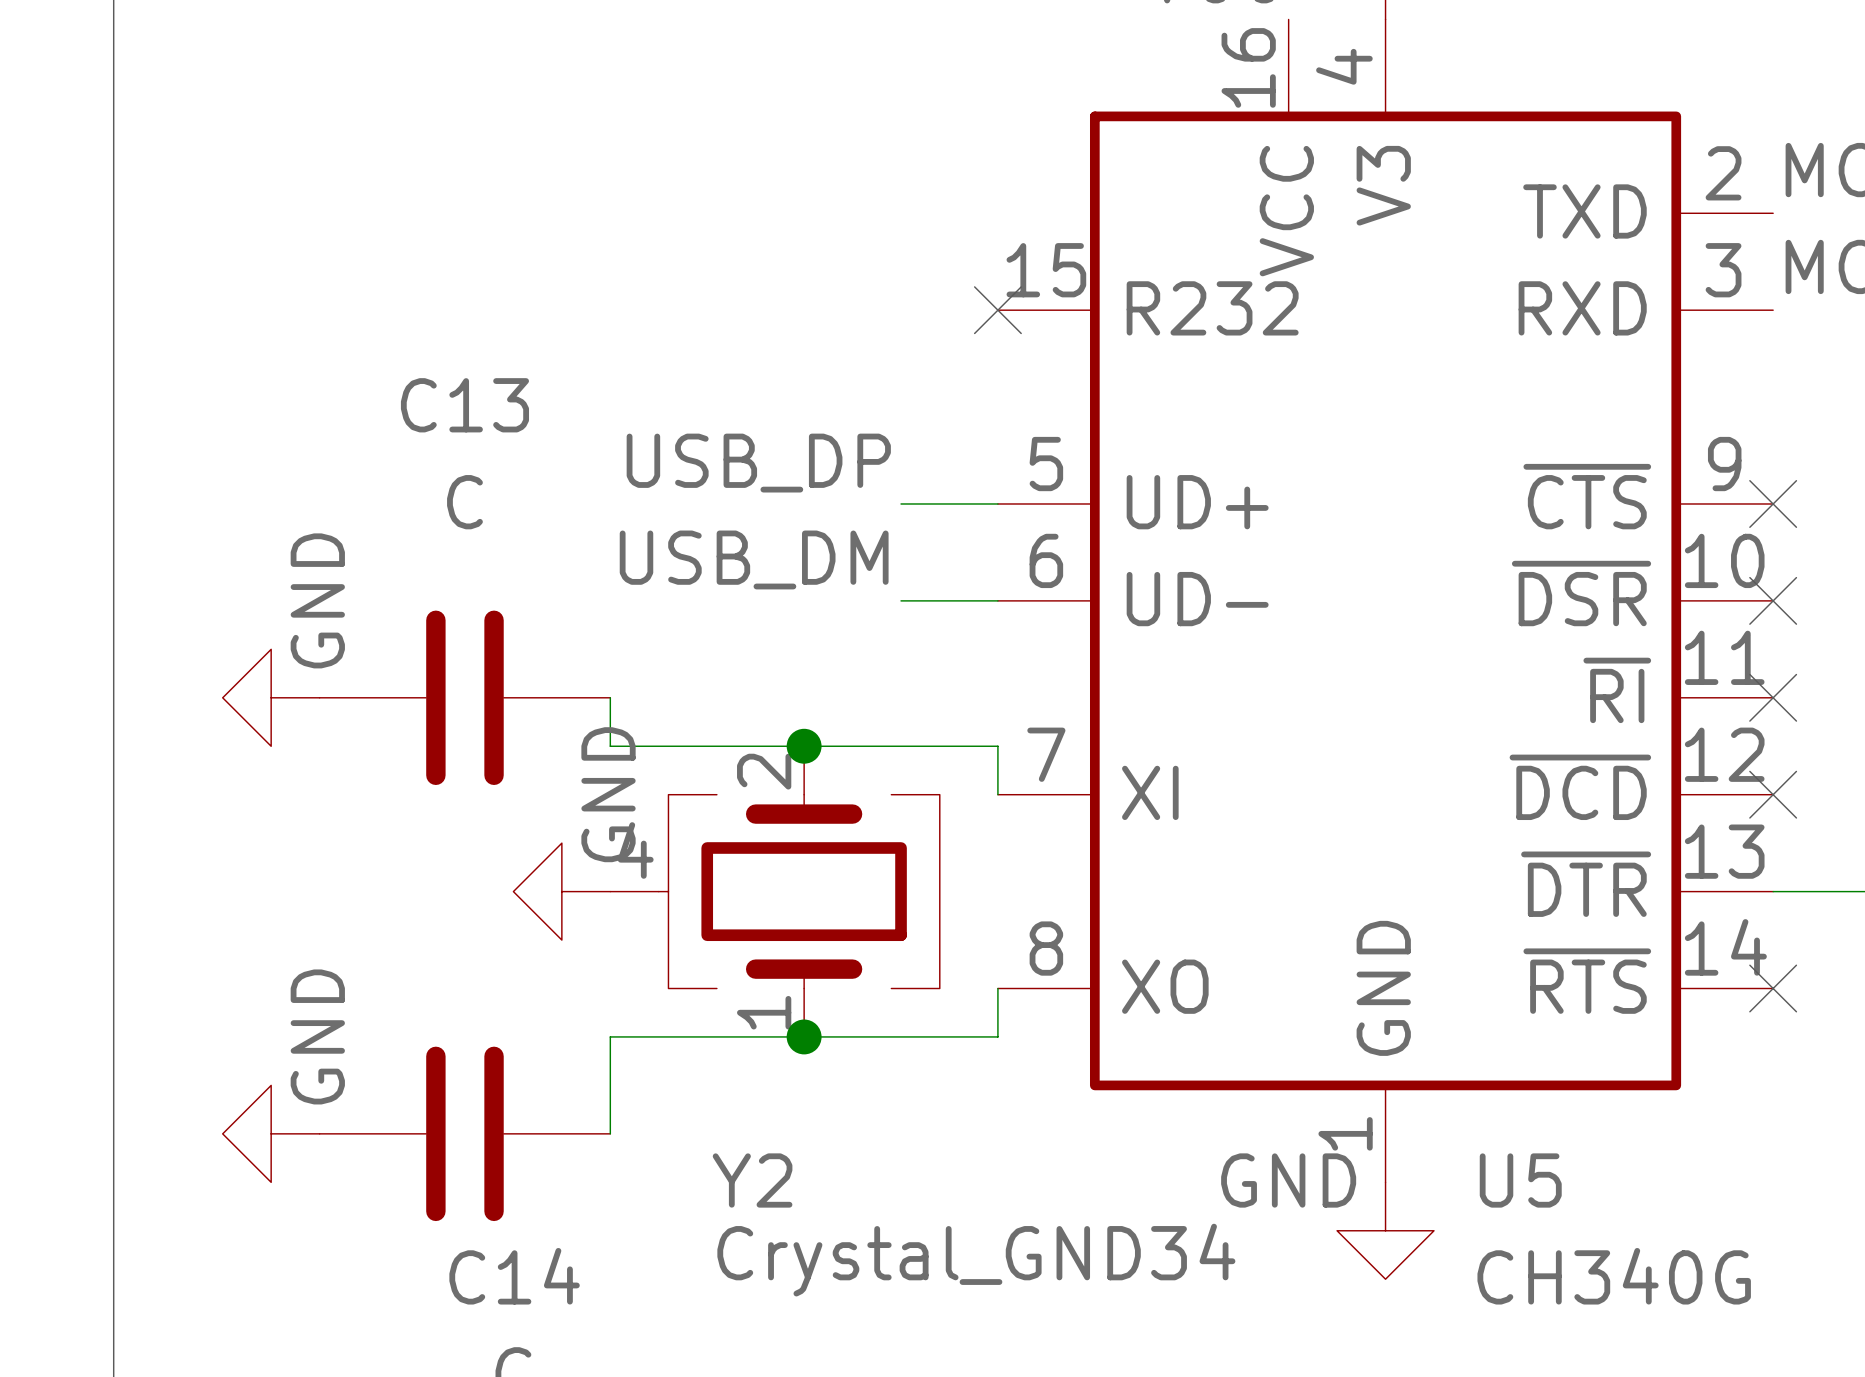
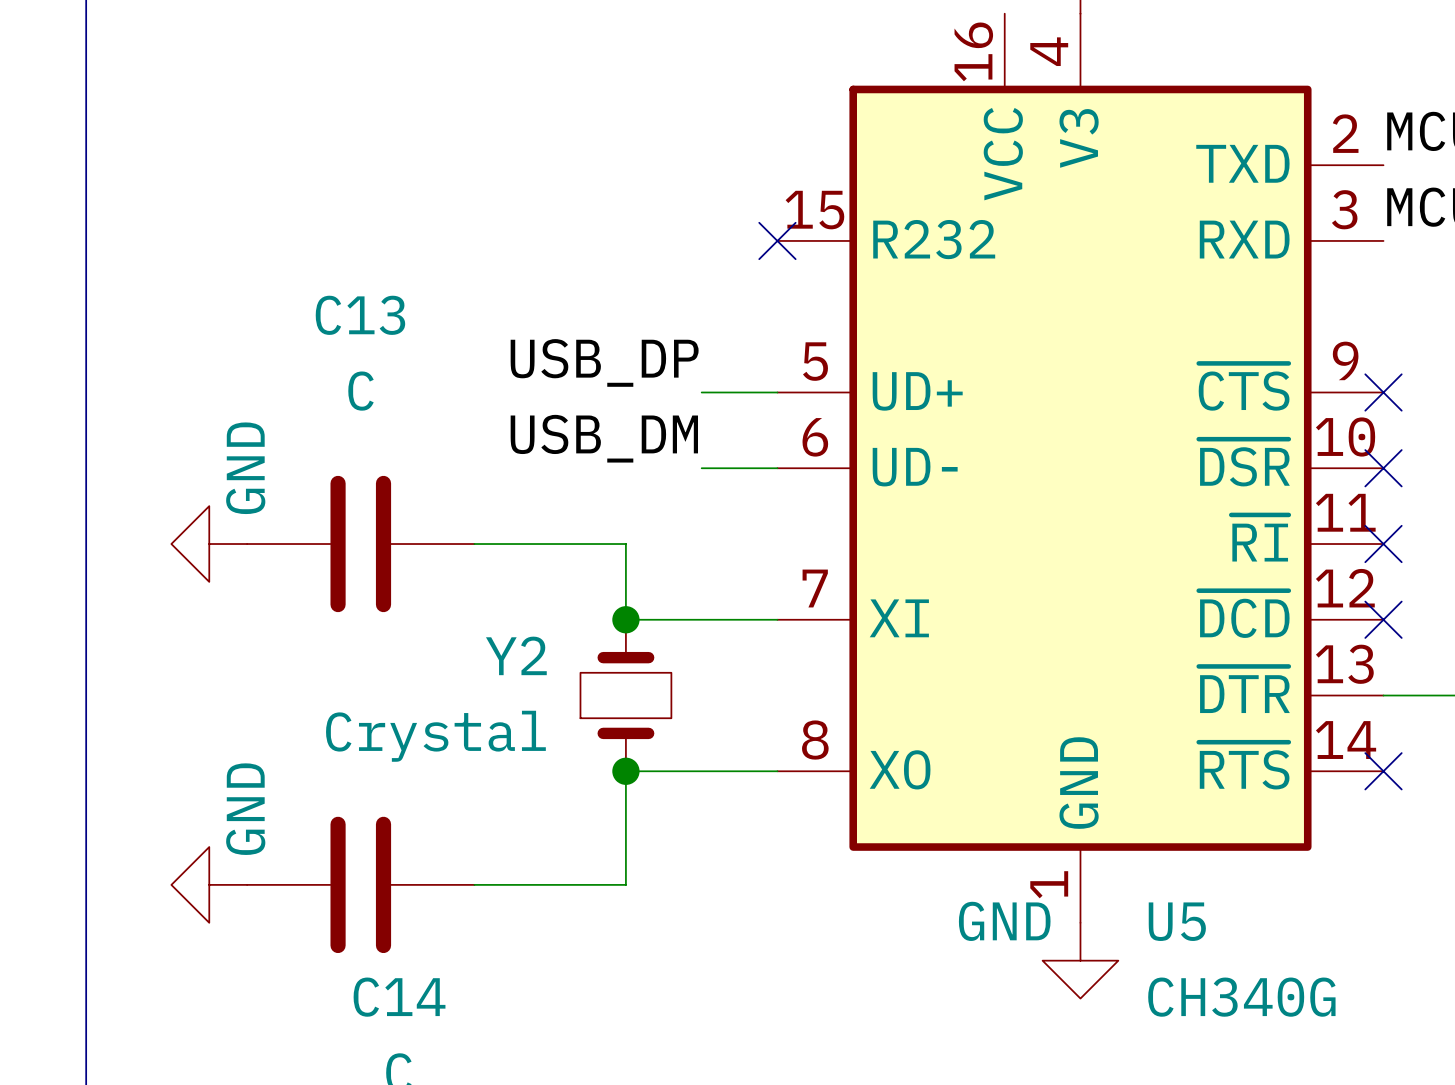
wire: (610, 697) (610, 746) (997, 746) (997, 794) -> (474, 544) (625, 544) (625, 619) (777, 619)
Y2 symbol: [610, 746, 940, 1037] -> [580, 619, 672, 772]
junction position: (804, 746) -> (625, 619)
power symbol: GND (561, 891) -> none
wire: (997, 988) (997, 1036) (610, 1036) (610, 1133) -> (777, 771) (625, 771) (625, 884) (474, 884)
junction position: (804, 1036) -> (625, 771)
Y2 name position: Y2 (752, 1180) -> Y2 (516, 655)
Y2 value: Crystal_GND34 (976, 1260) -> Crystal (435, 736)

